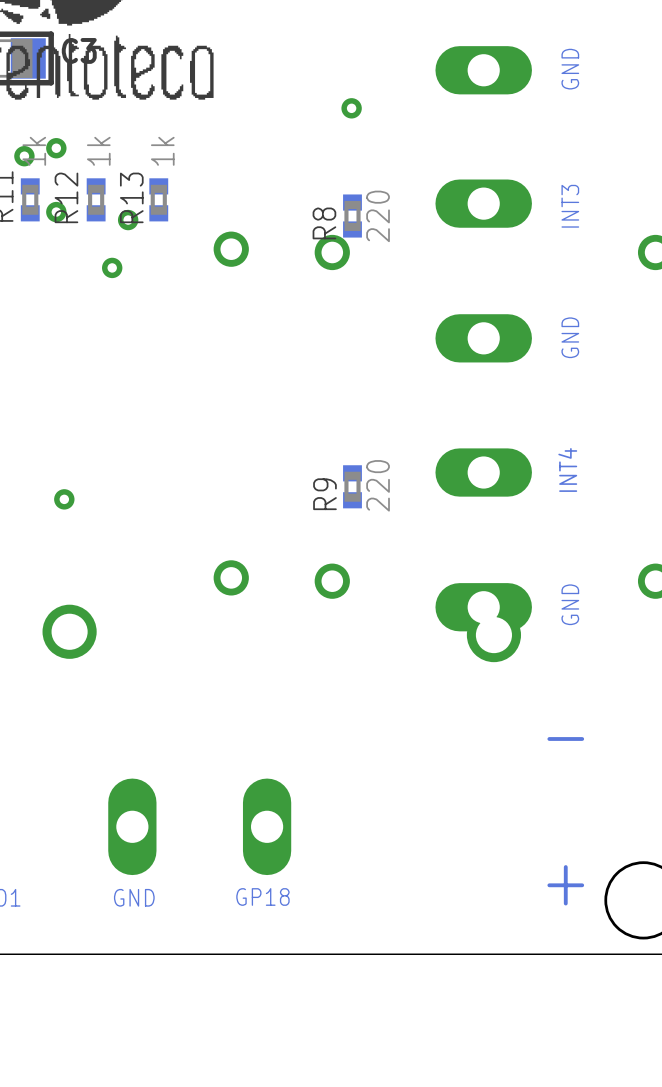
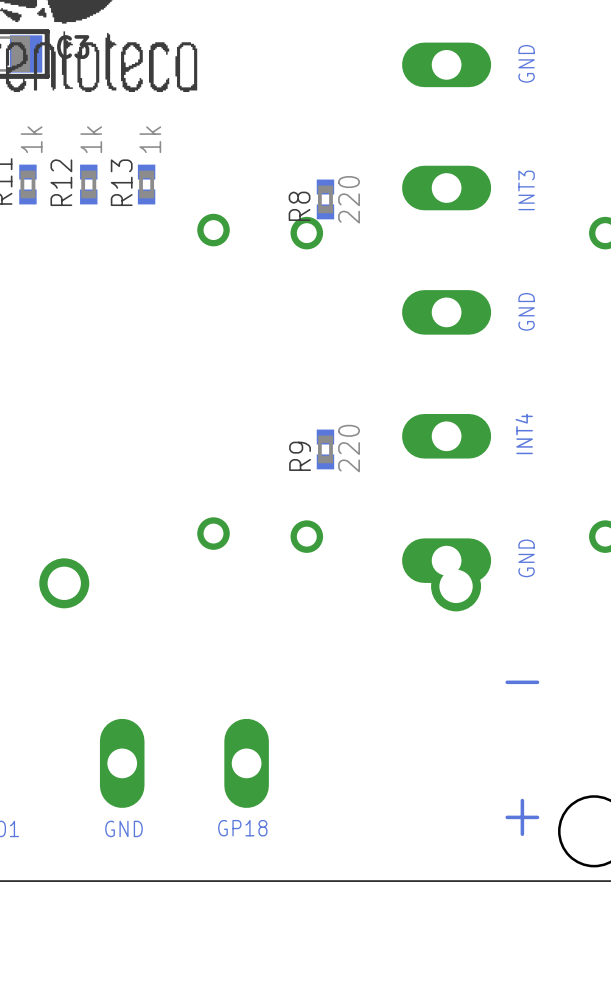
via: (351, 108) -> none
via: (56, 148) -> none
via: (24, 156) -> none
via: (56, 212) -> none
via: (128, 220) -> none
via: (112, 267) -> none
via: (64, 499) -> none

